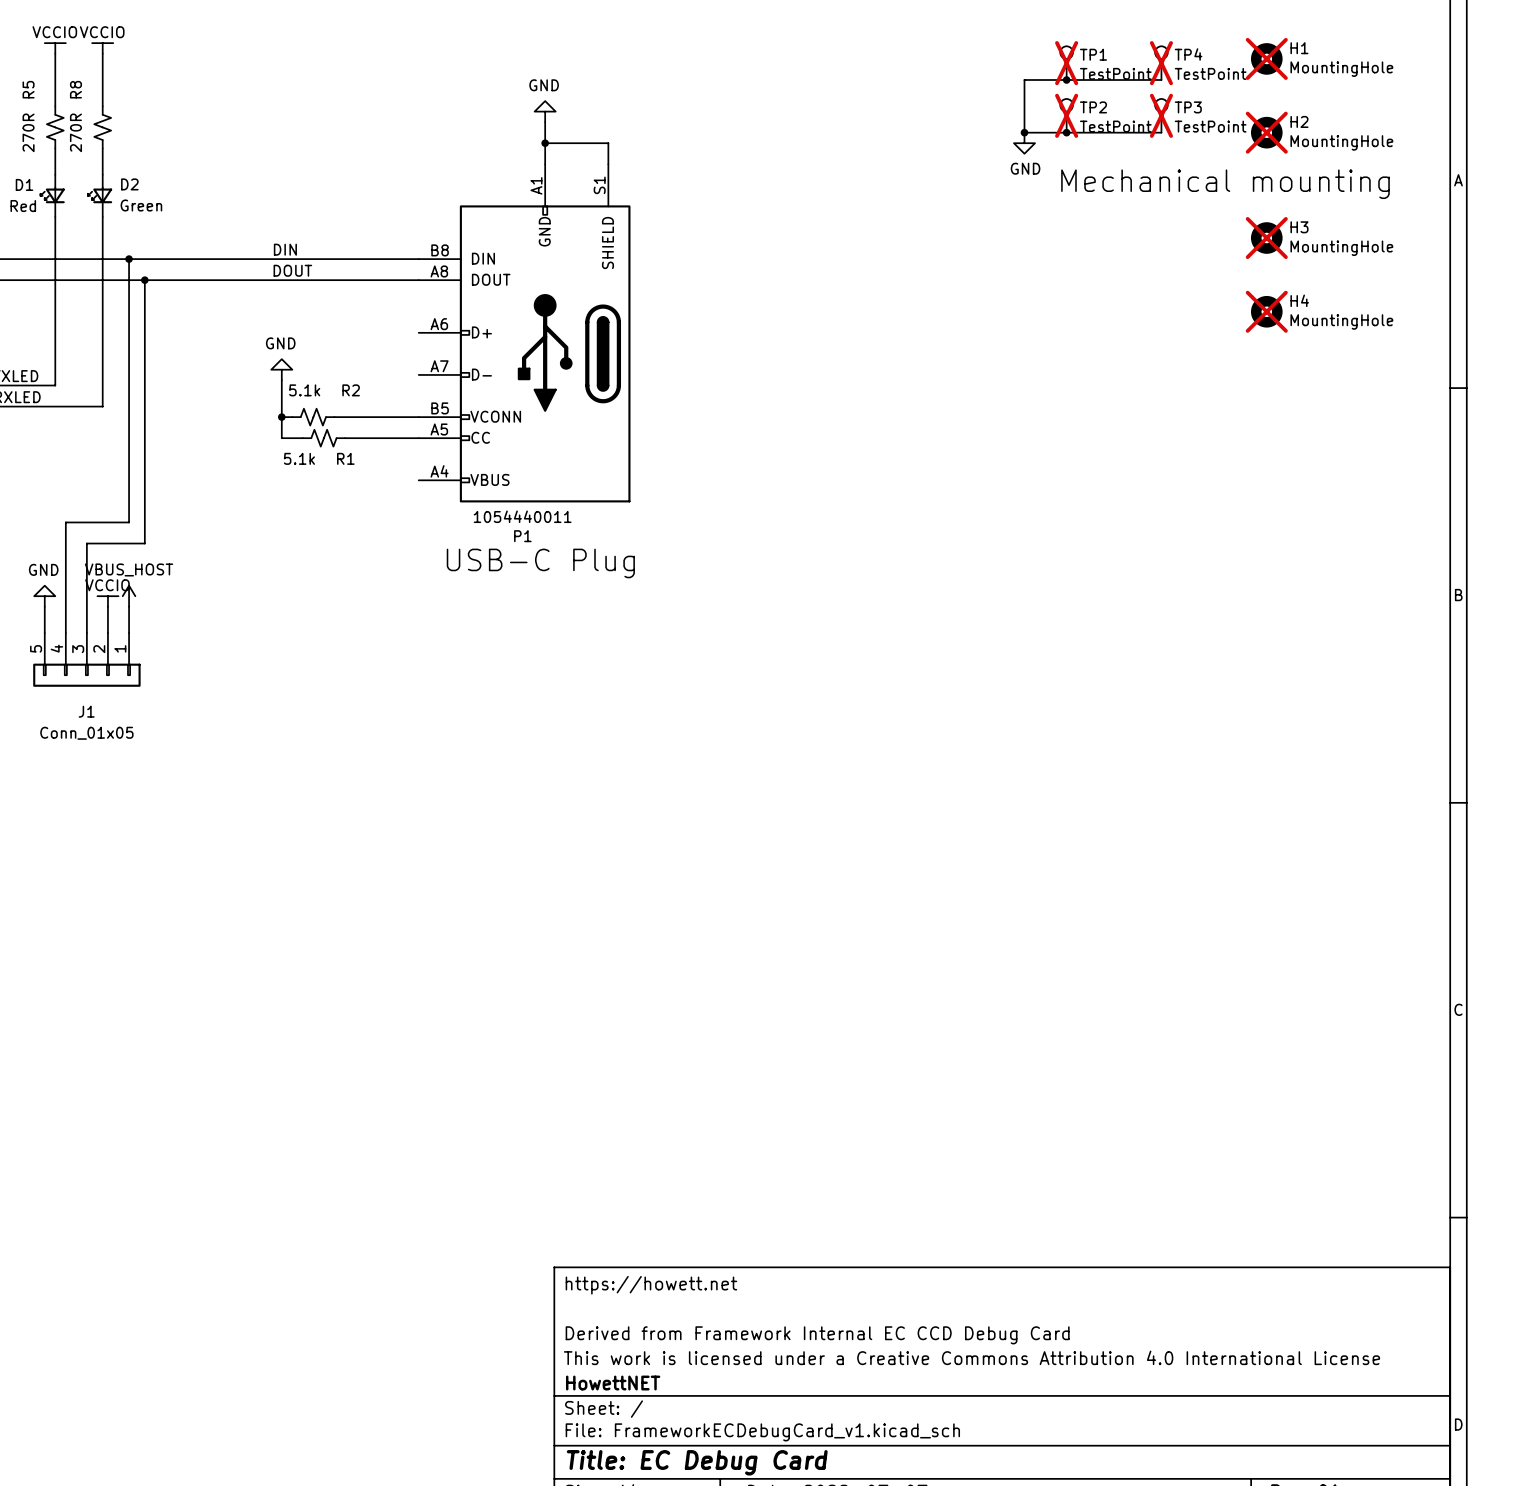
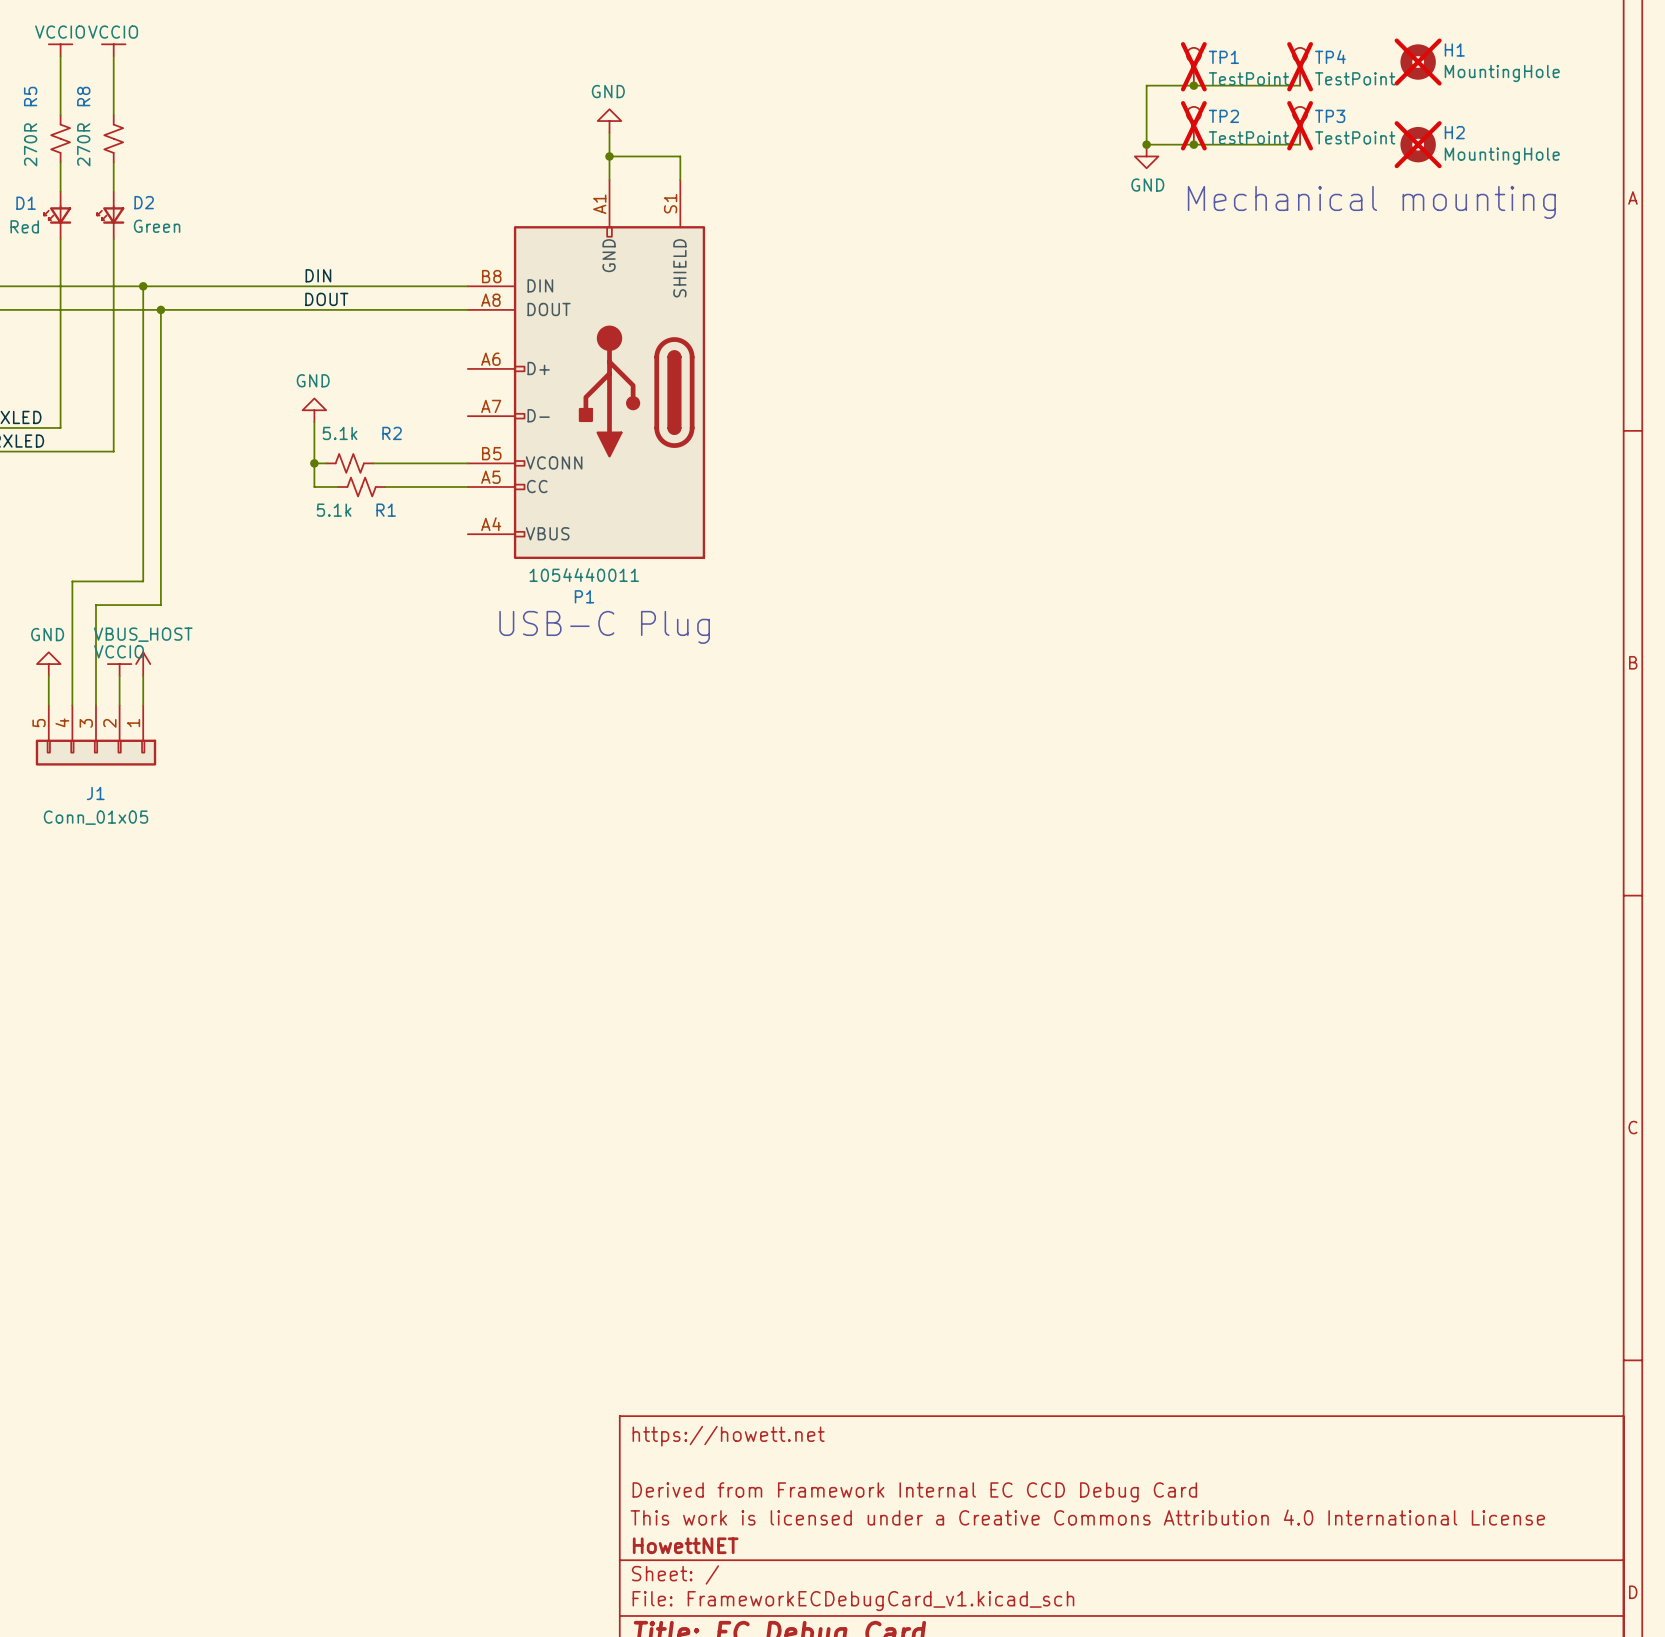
H3: MountingHole (1266, 238) -> none
H4: MountingHole (1266, 311) -> none

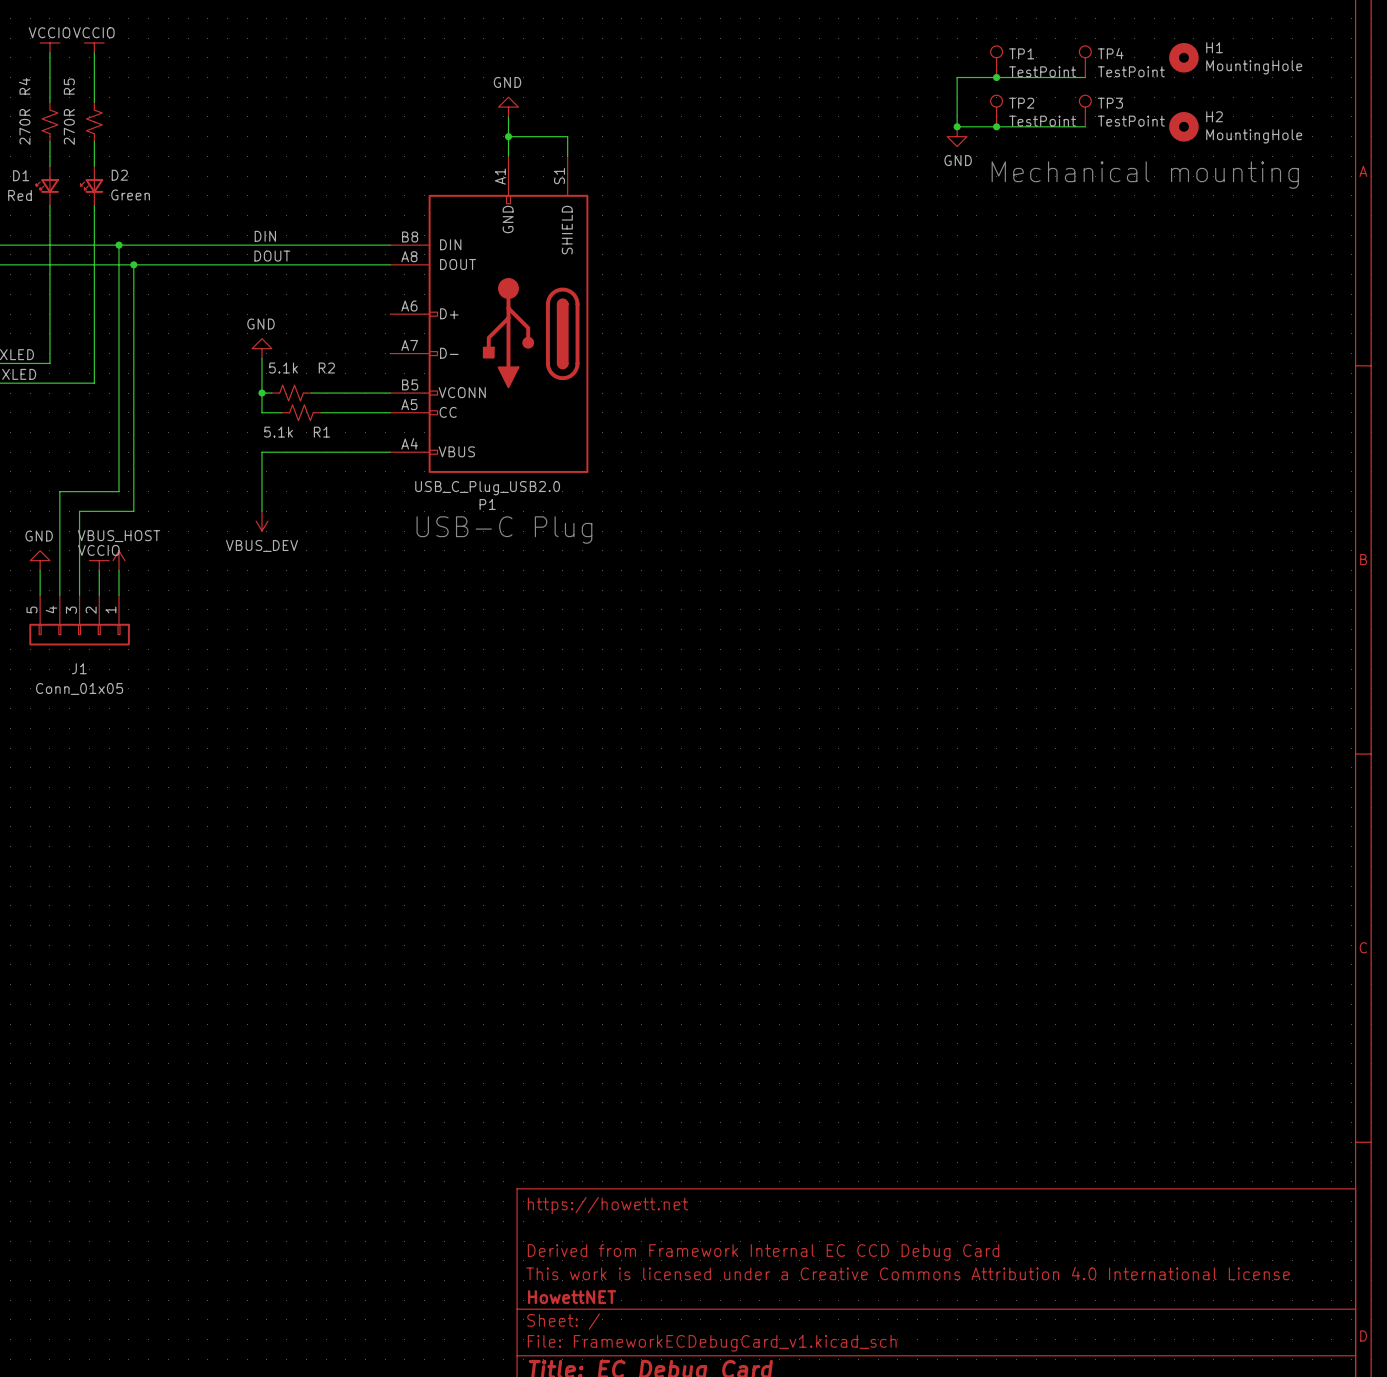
H1 do-not-place cross: (1418, 62) -> none
TP1 do-not-place cross: (1193, 66) -> none
TP4 do-not-place cross: (1300, 66) -> none
R5 name: R5 (30, 96) -> R4 (24, 86)
R8 name: R8 (83, 96) -> R5 (69, 86)
TP2 do-not-place cross: (1193, 125) -> none
TP3 do-not-place cross: (1300, 125) -> none
H2 do-not-place cross: (1418, 144) -> none
wire: none -> (390, 452) (261, 452) (261, 511)
P1 value: 1054440011 (584, 575) -> USB_C_Plug_USB2.0 (487, 488)
power symbol: none -> VBUS_DEV (262, 521)

